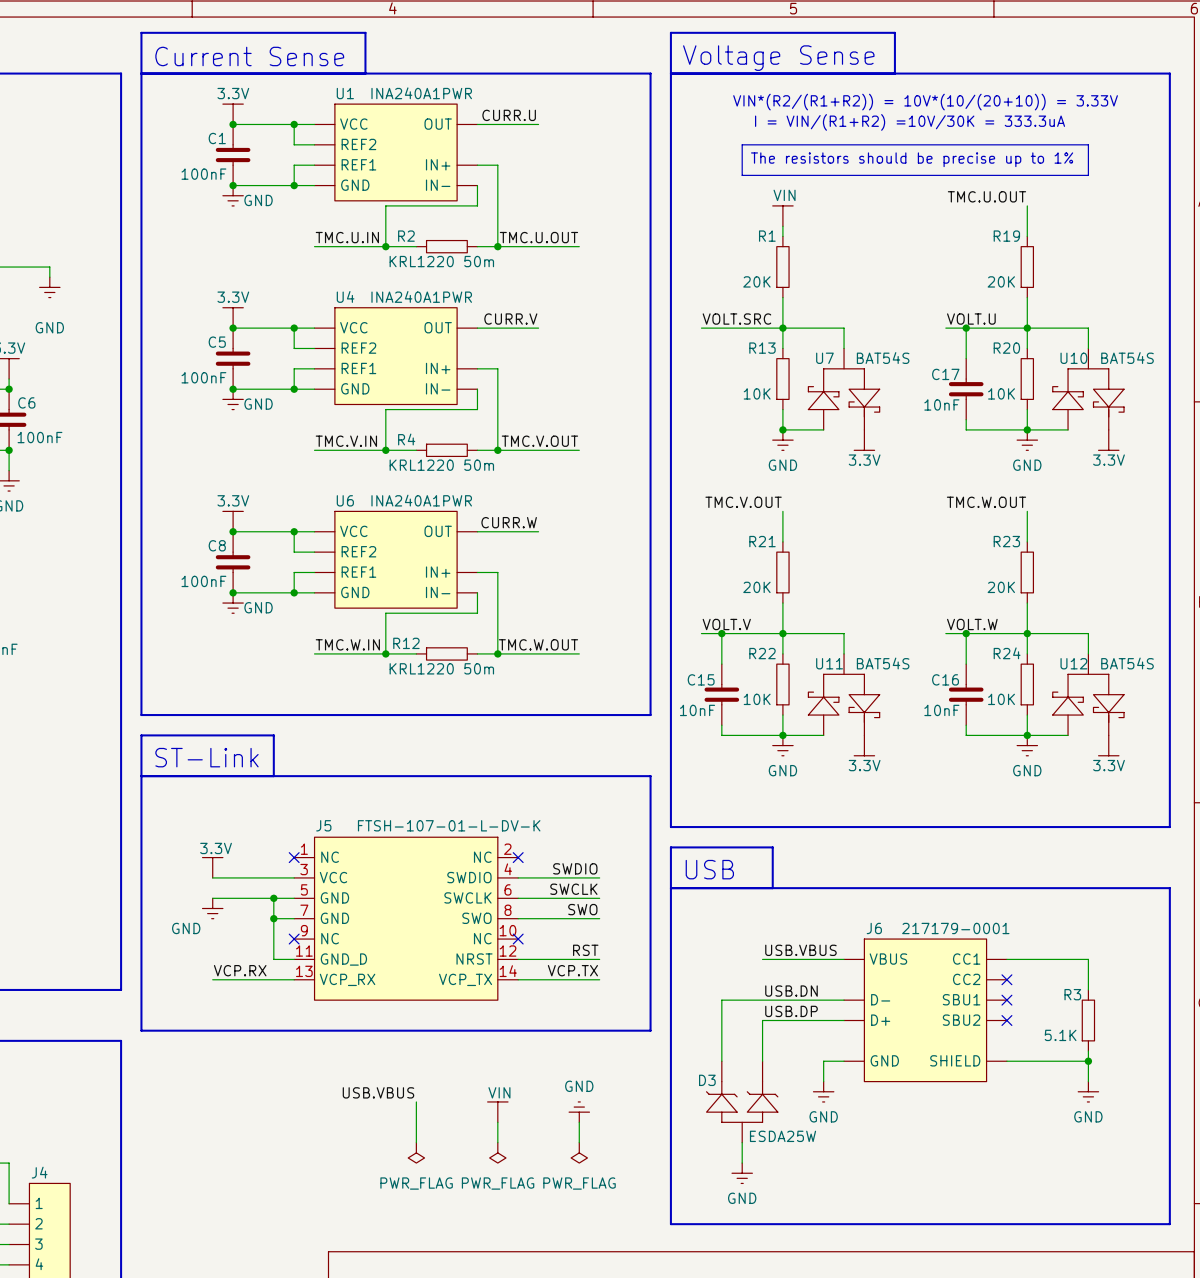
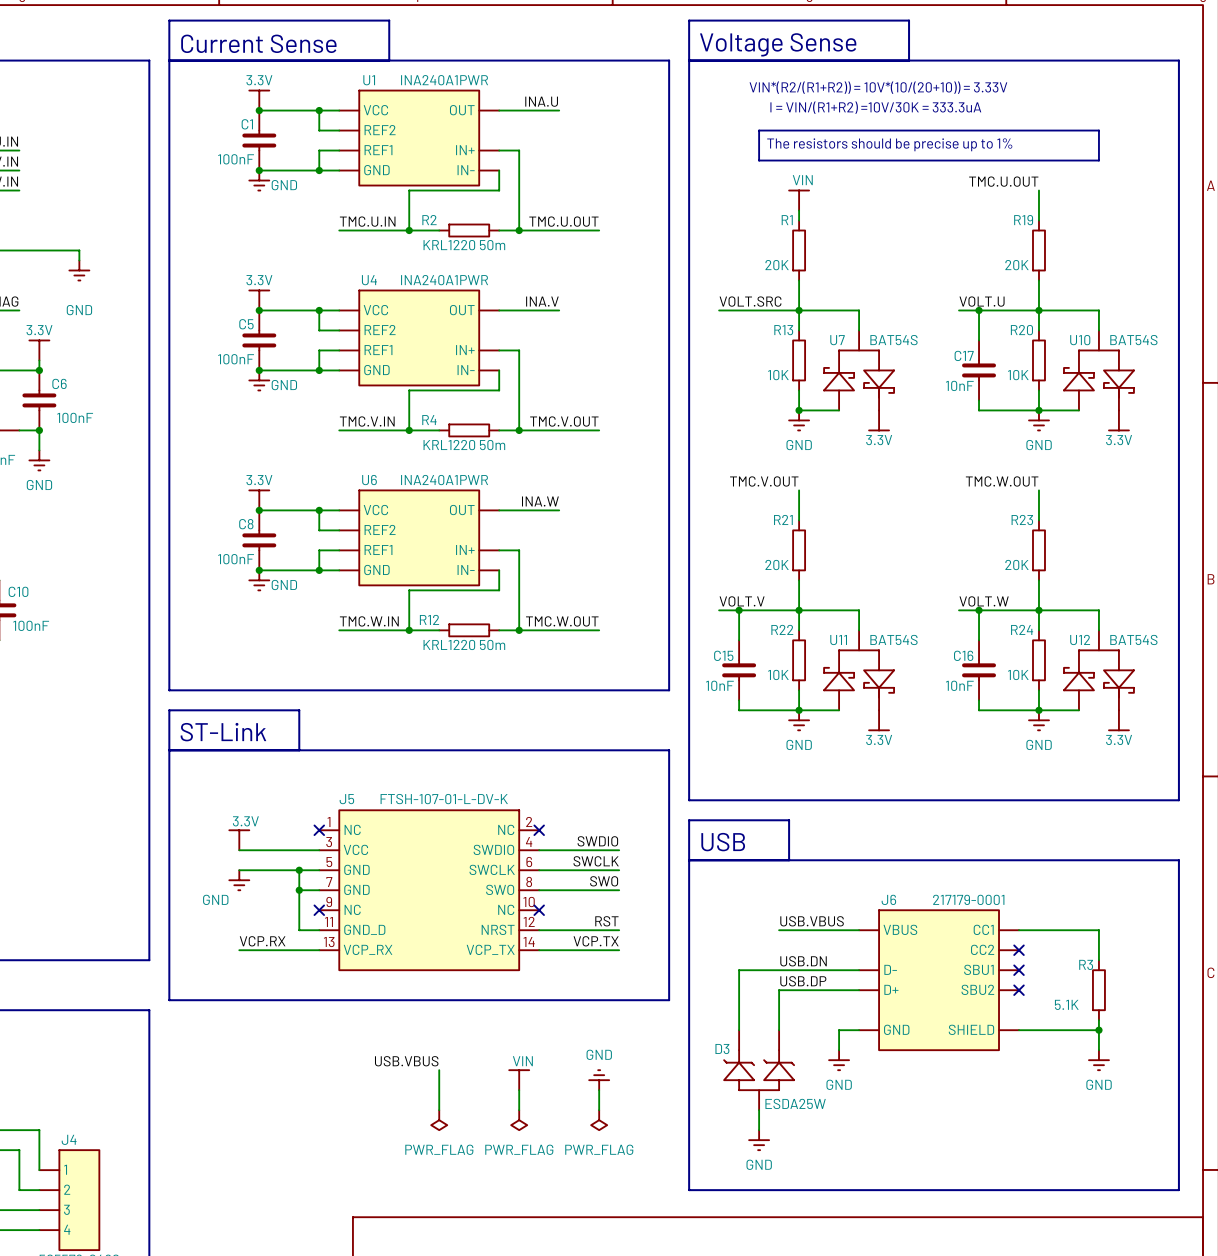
label: CURR.U (509, 115) -> INA.U (541, 101)
label: CURR.V (510, 319) -> INA.V (542, 301)
label: CURR.W (509, 522) -> INA.W (540, 501)

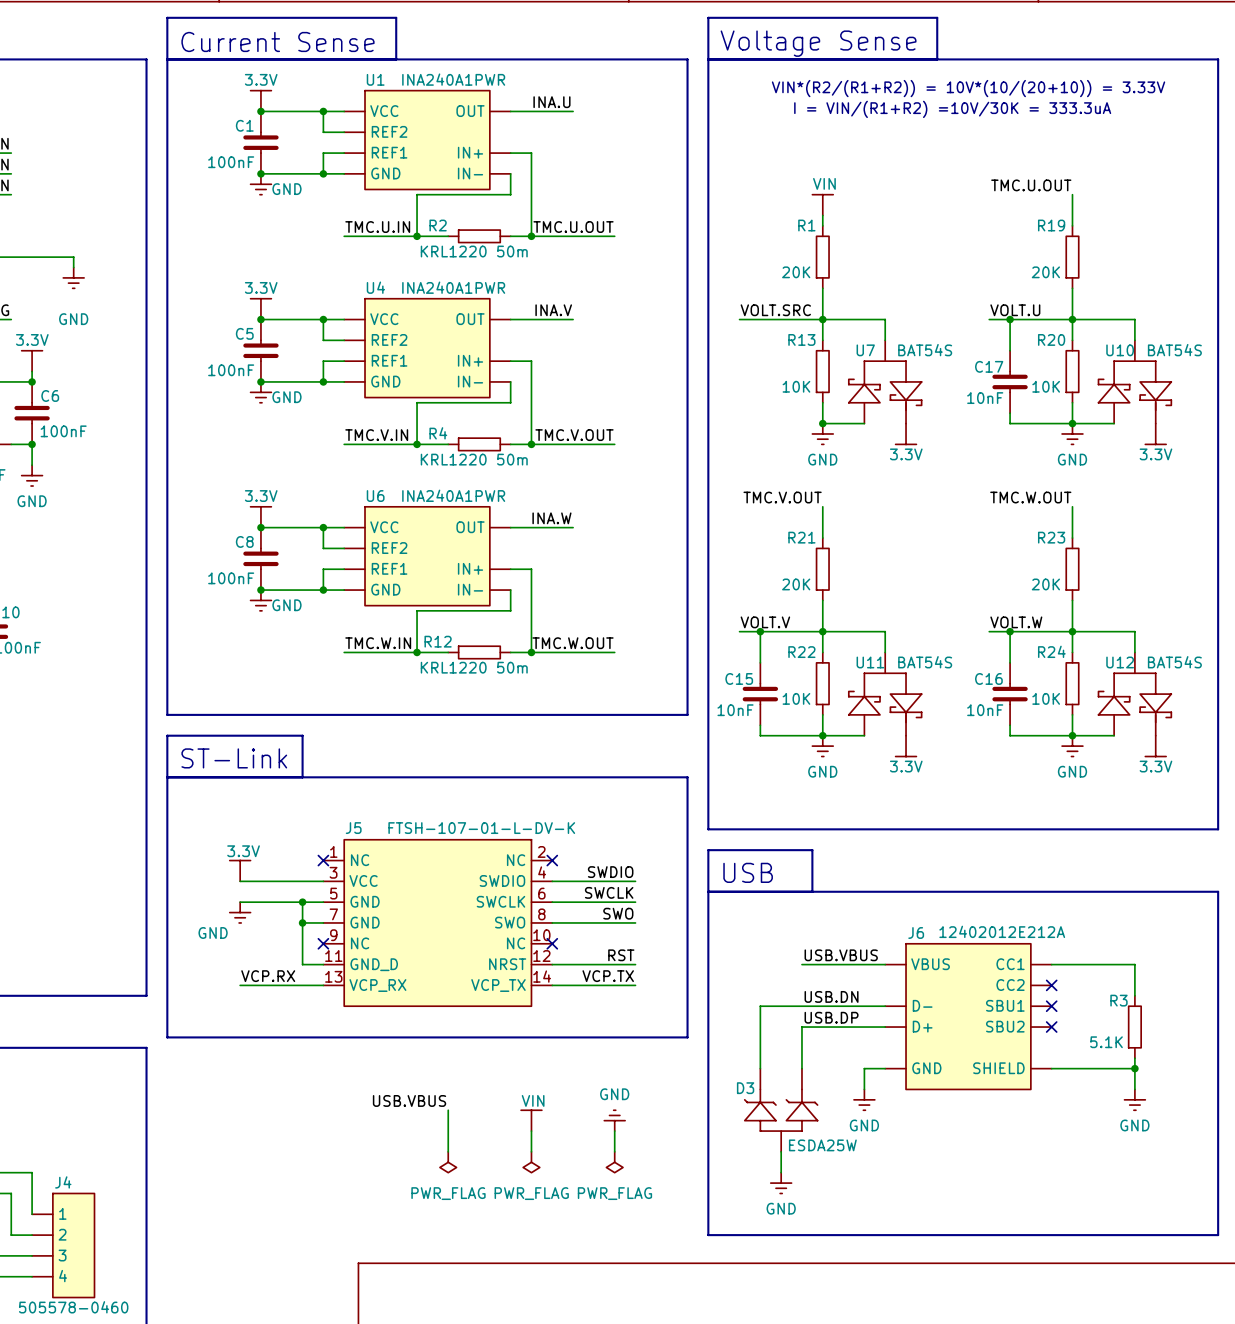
line: (759, 130) (1098, 130) (1098, 160) (759, 160) (759, 130) -> none
text: The resistors should be precise up to 1% (889, 144) -> none
J6 value: 217179-0001 (968, 899) -> 12402012E212A (1002, 931)

